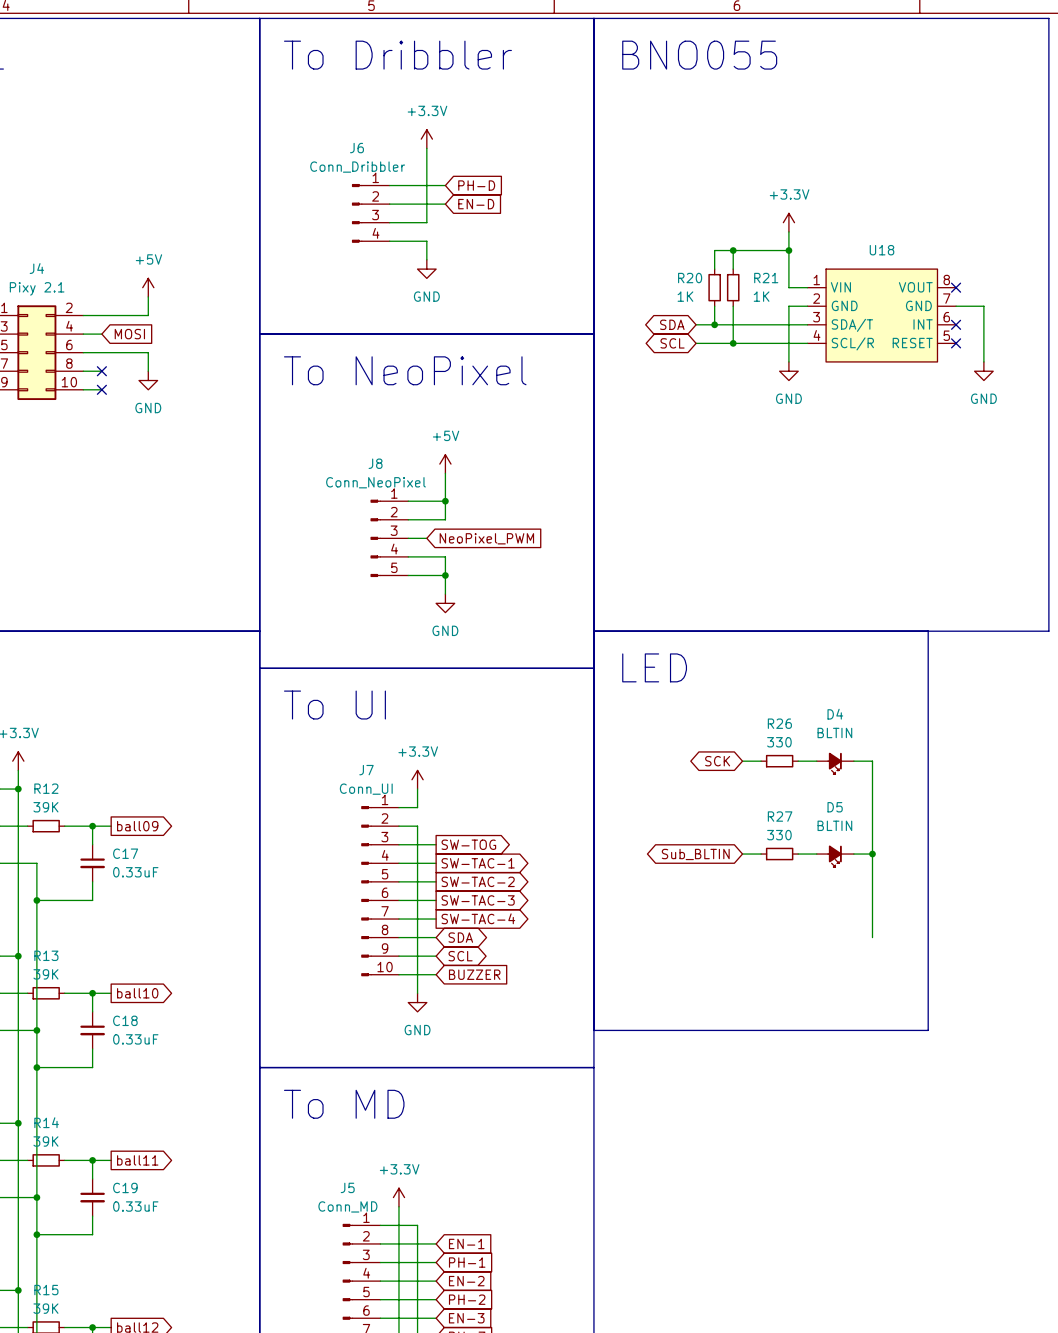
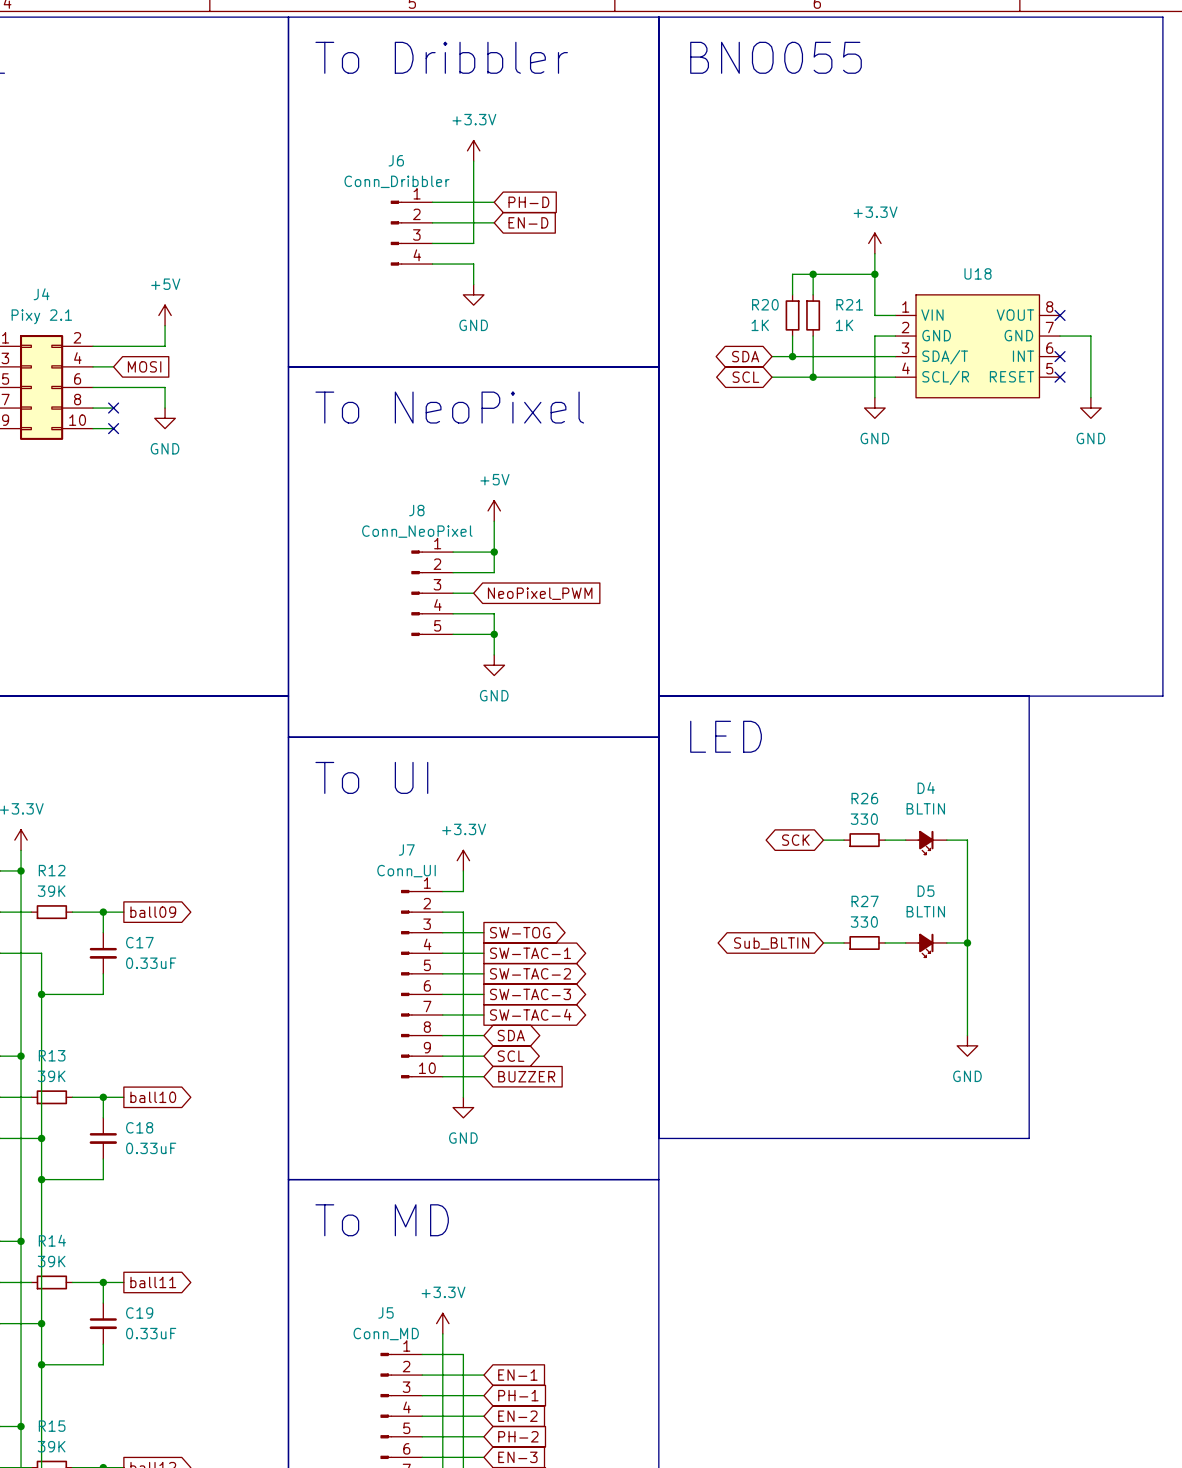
power symbol: none -> GND (967, 1045)

